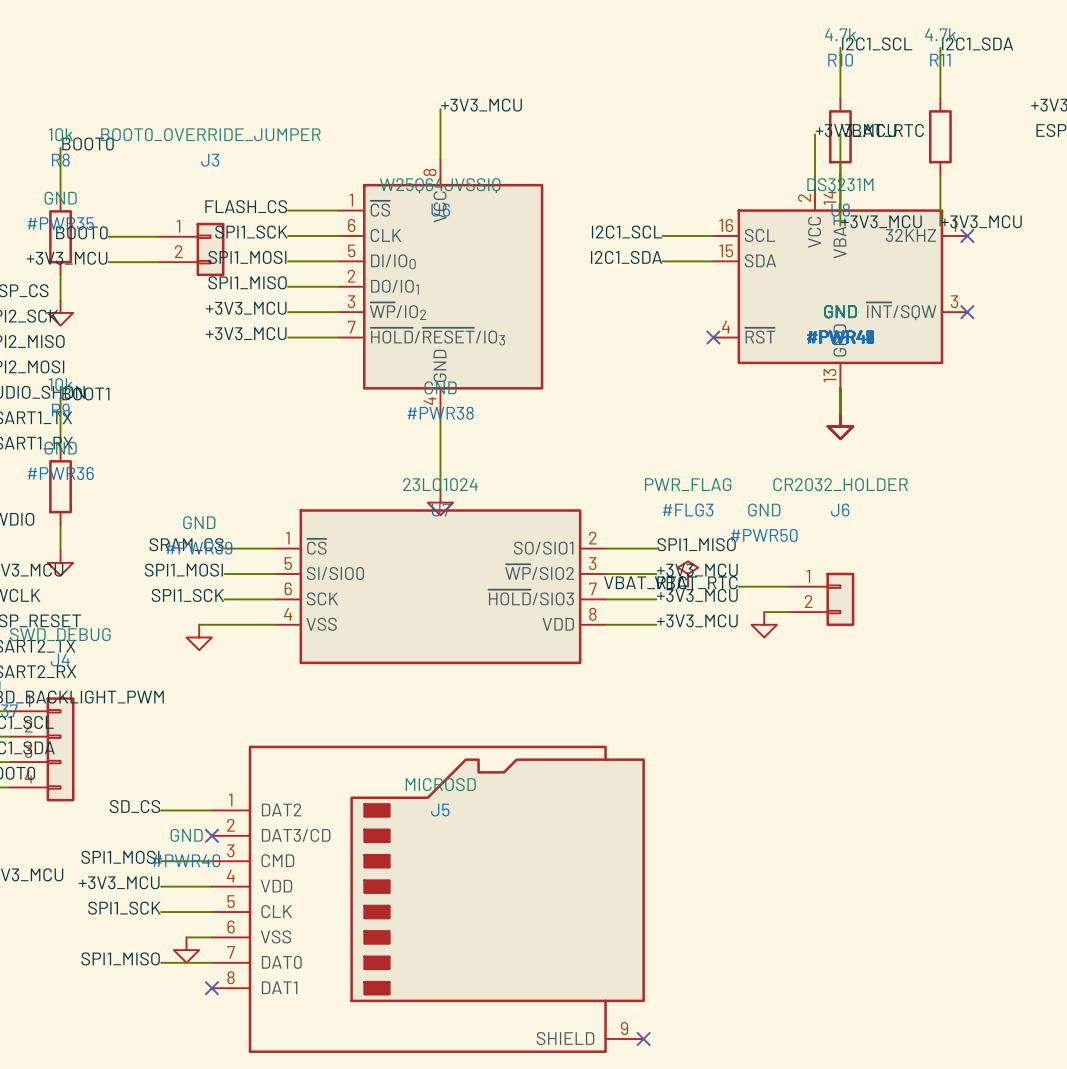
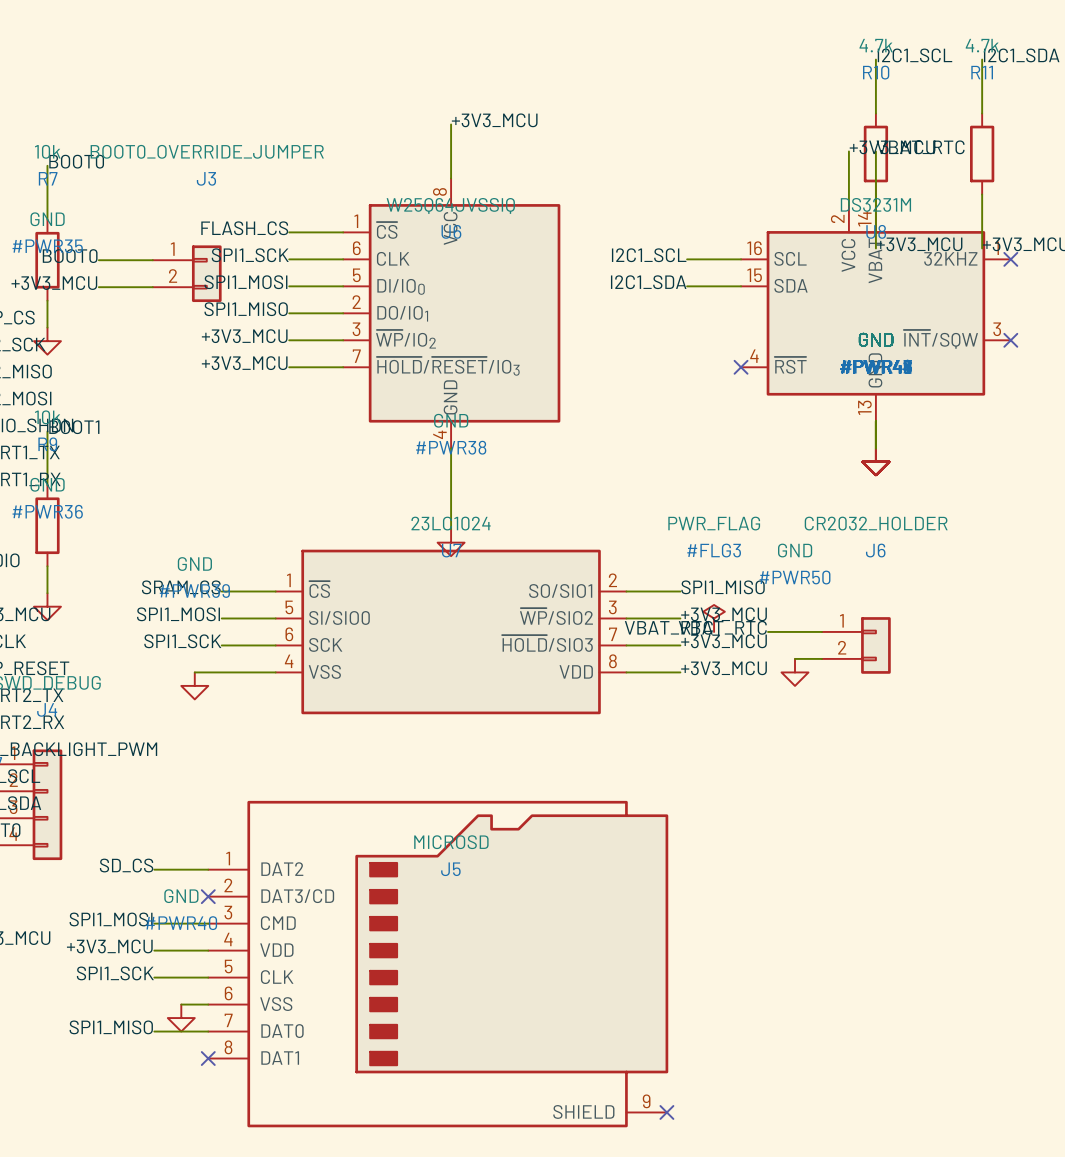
R8 name: R8 (60, 160) -> R7 (48, 178)

